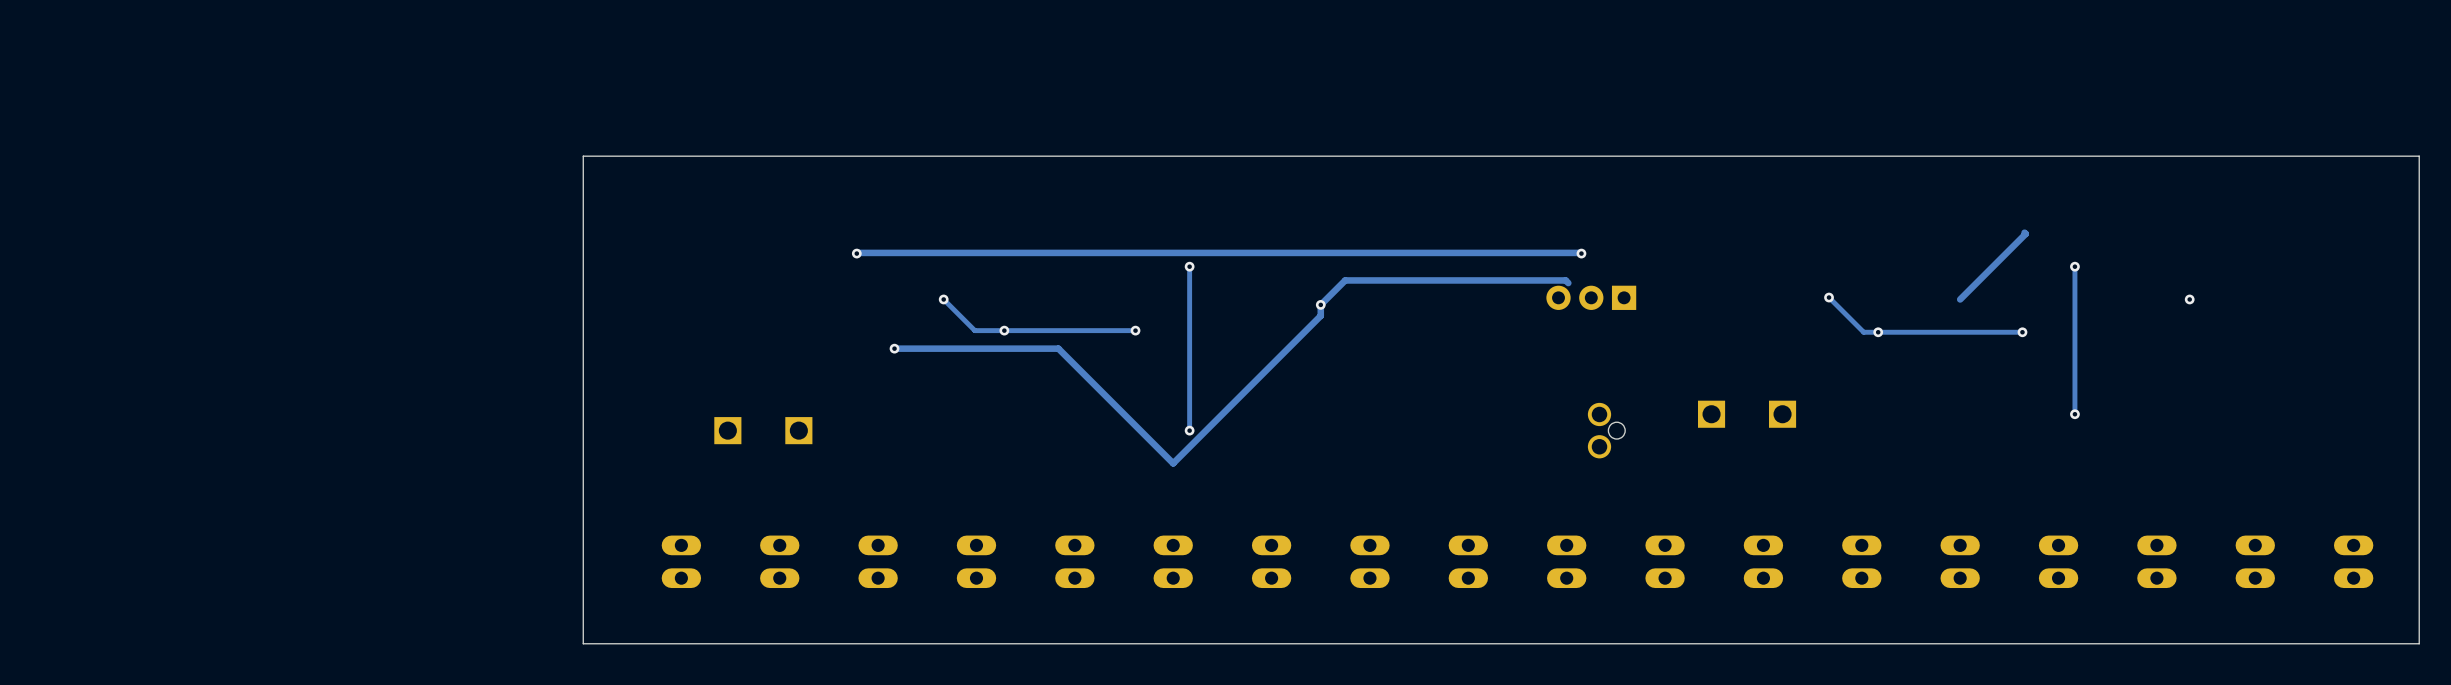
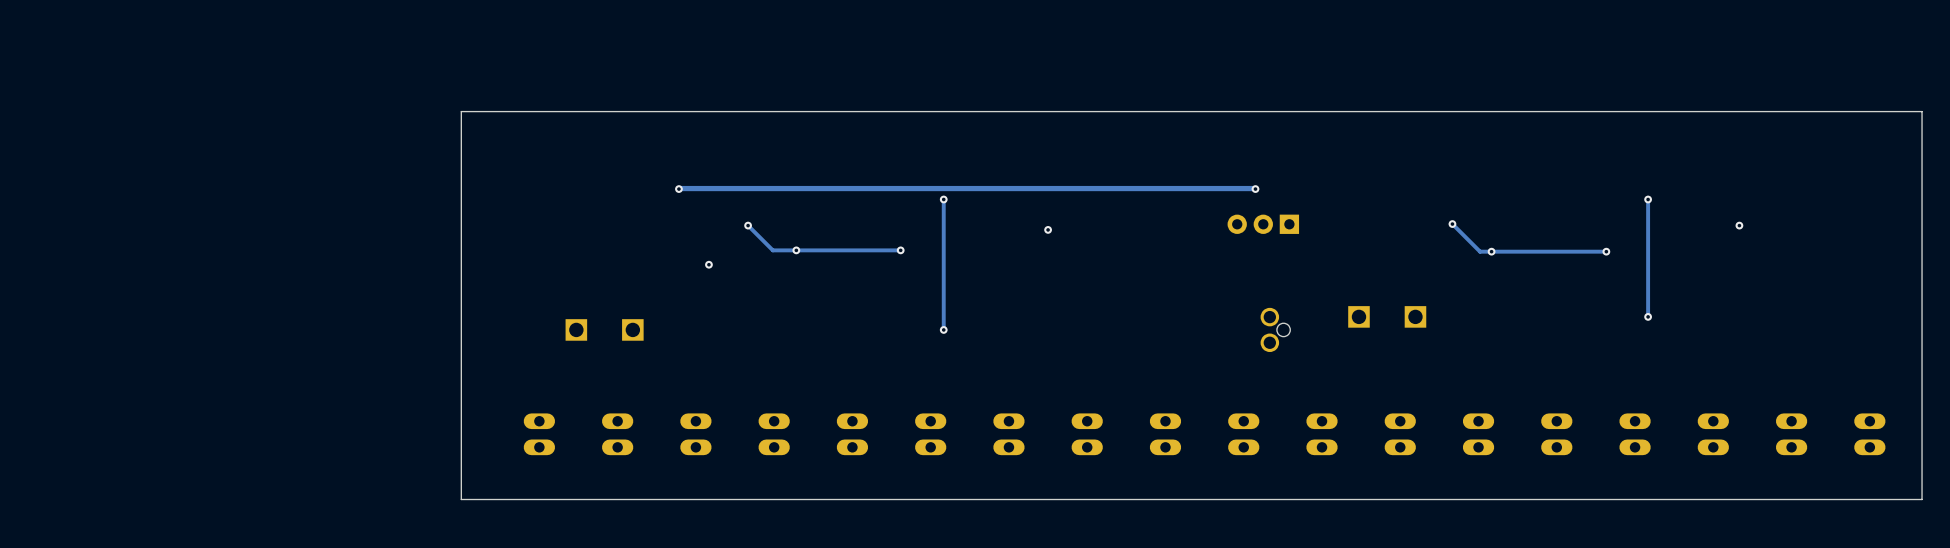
track: (2024, 232) (2025, 233) (1960, 299) -> none
track: (1568, 283) (1565, 280) (1345, 280) (1320, 304) (1320, 315) (1173, 463) (1058, 348) (894, 348) -> none

